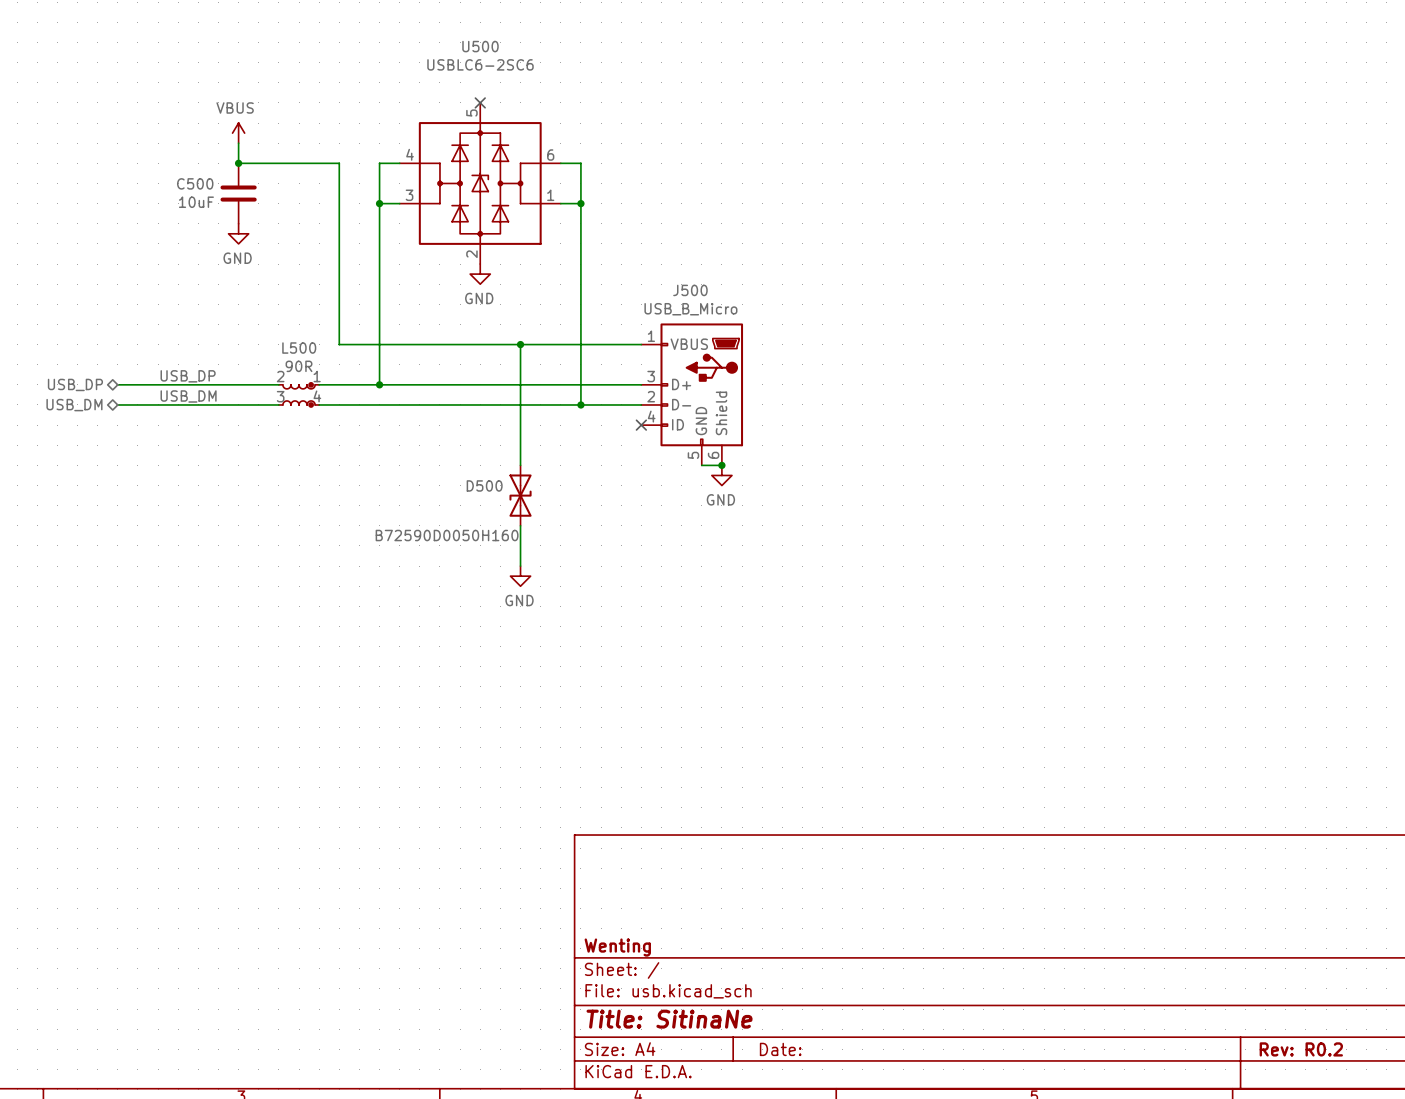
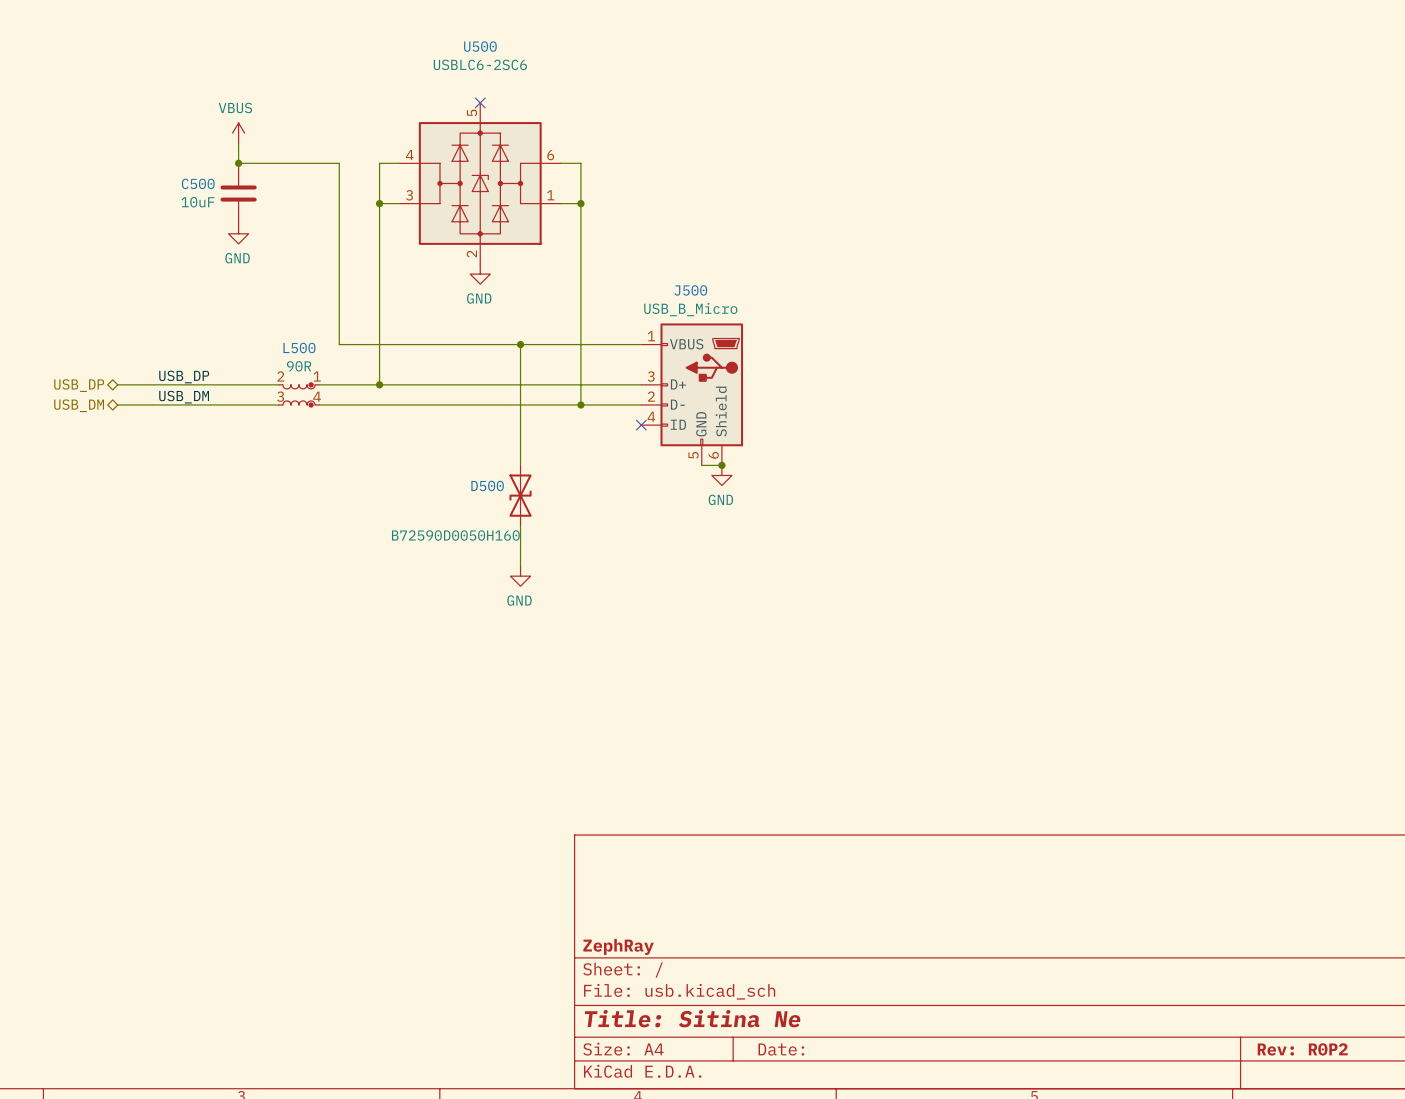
title block: Wenting (617, 947) -> ZephRay (618, 946)
title block: Title: SitinaNe (669, 1019) -> Title: Sitina Ne (692, 1018)
title block: Rev: R0.2 (1301, 1049) -> Rev: R0P2 (1302, 1049)

